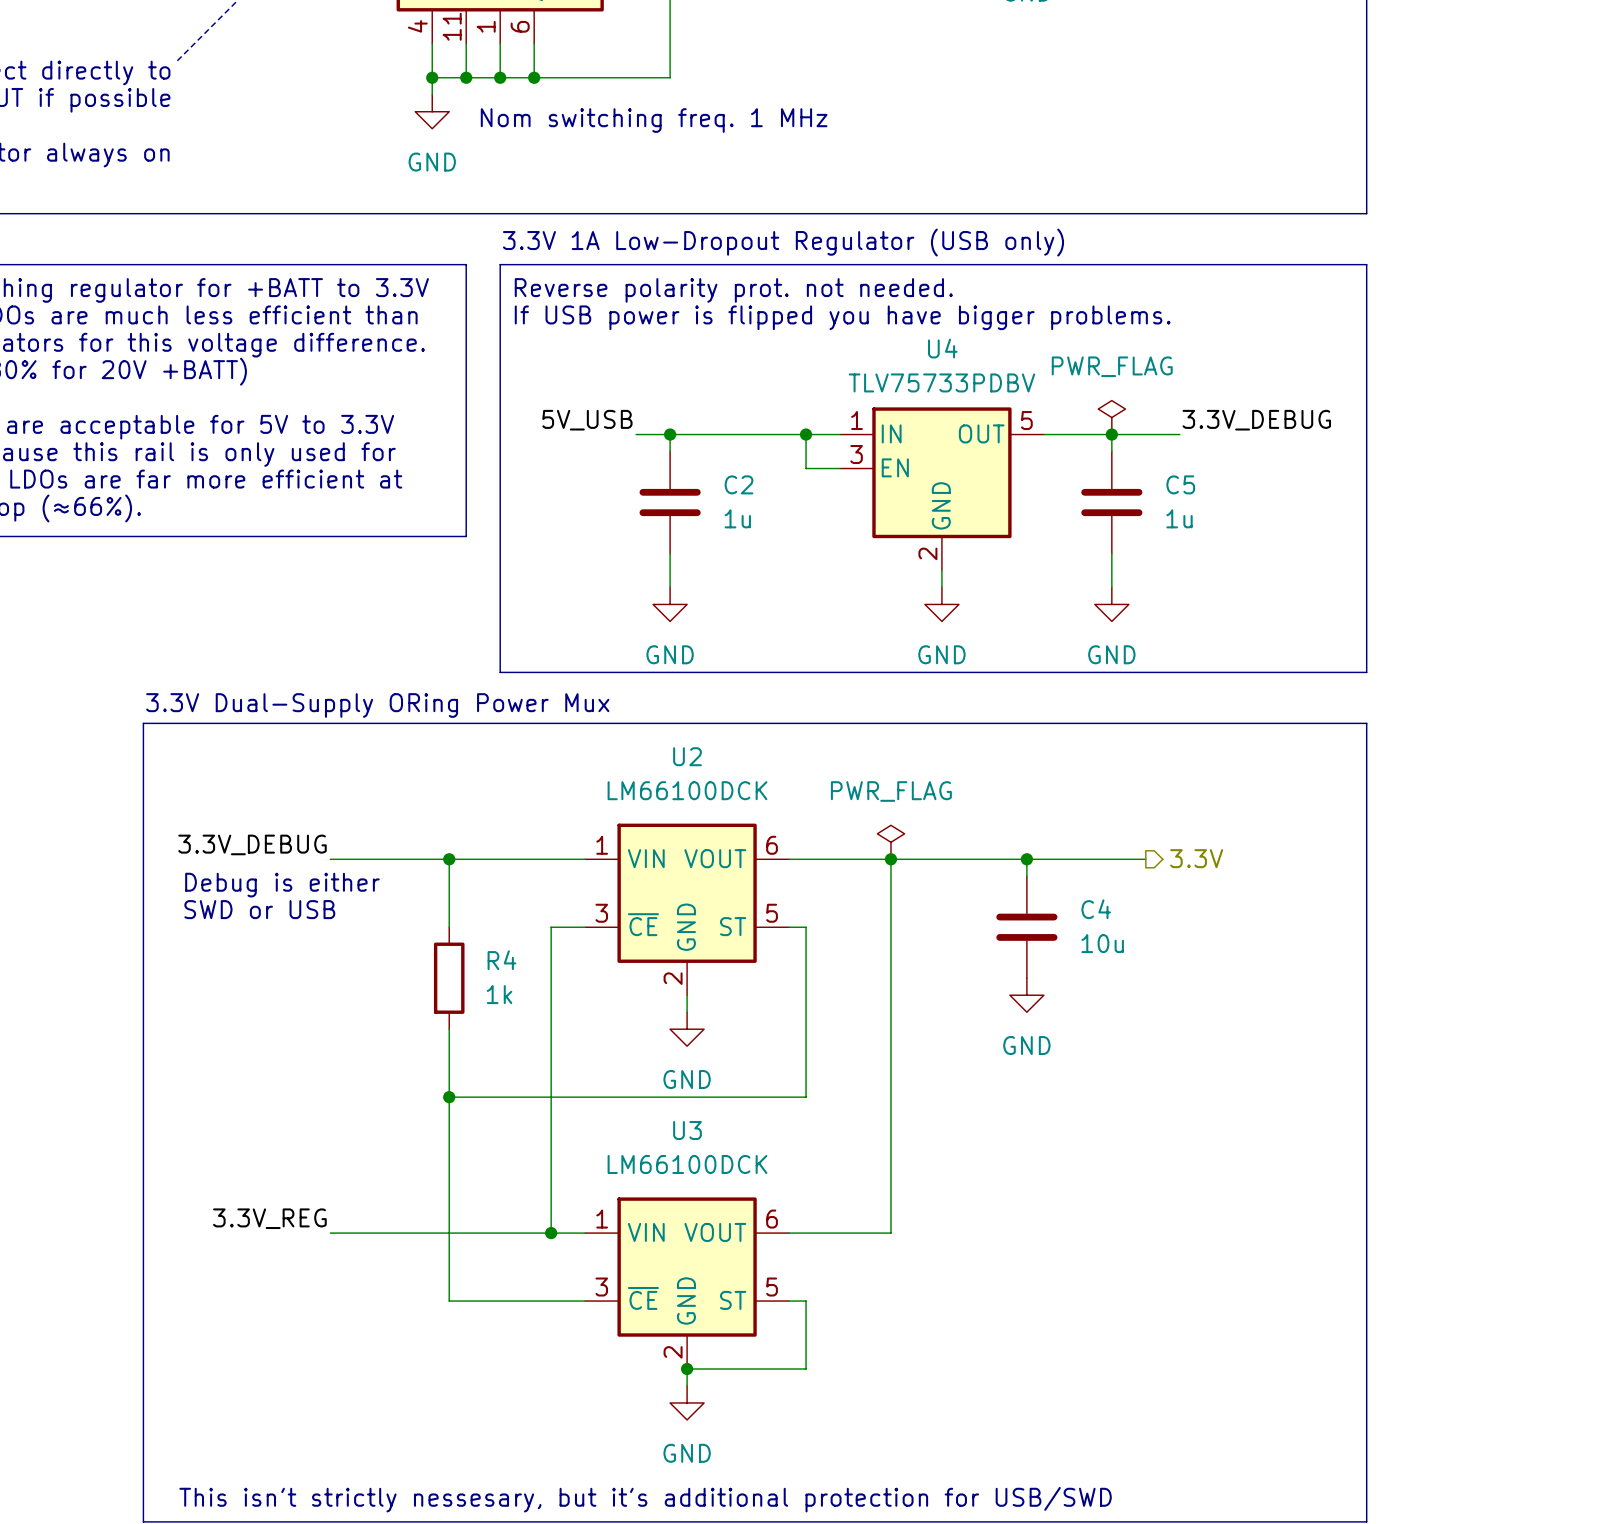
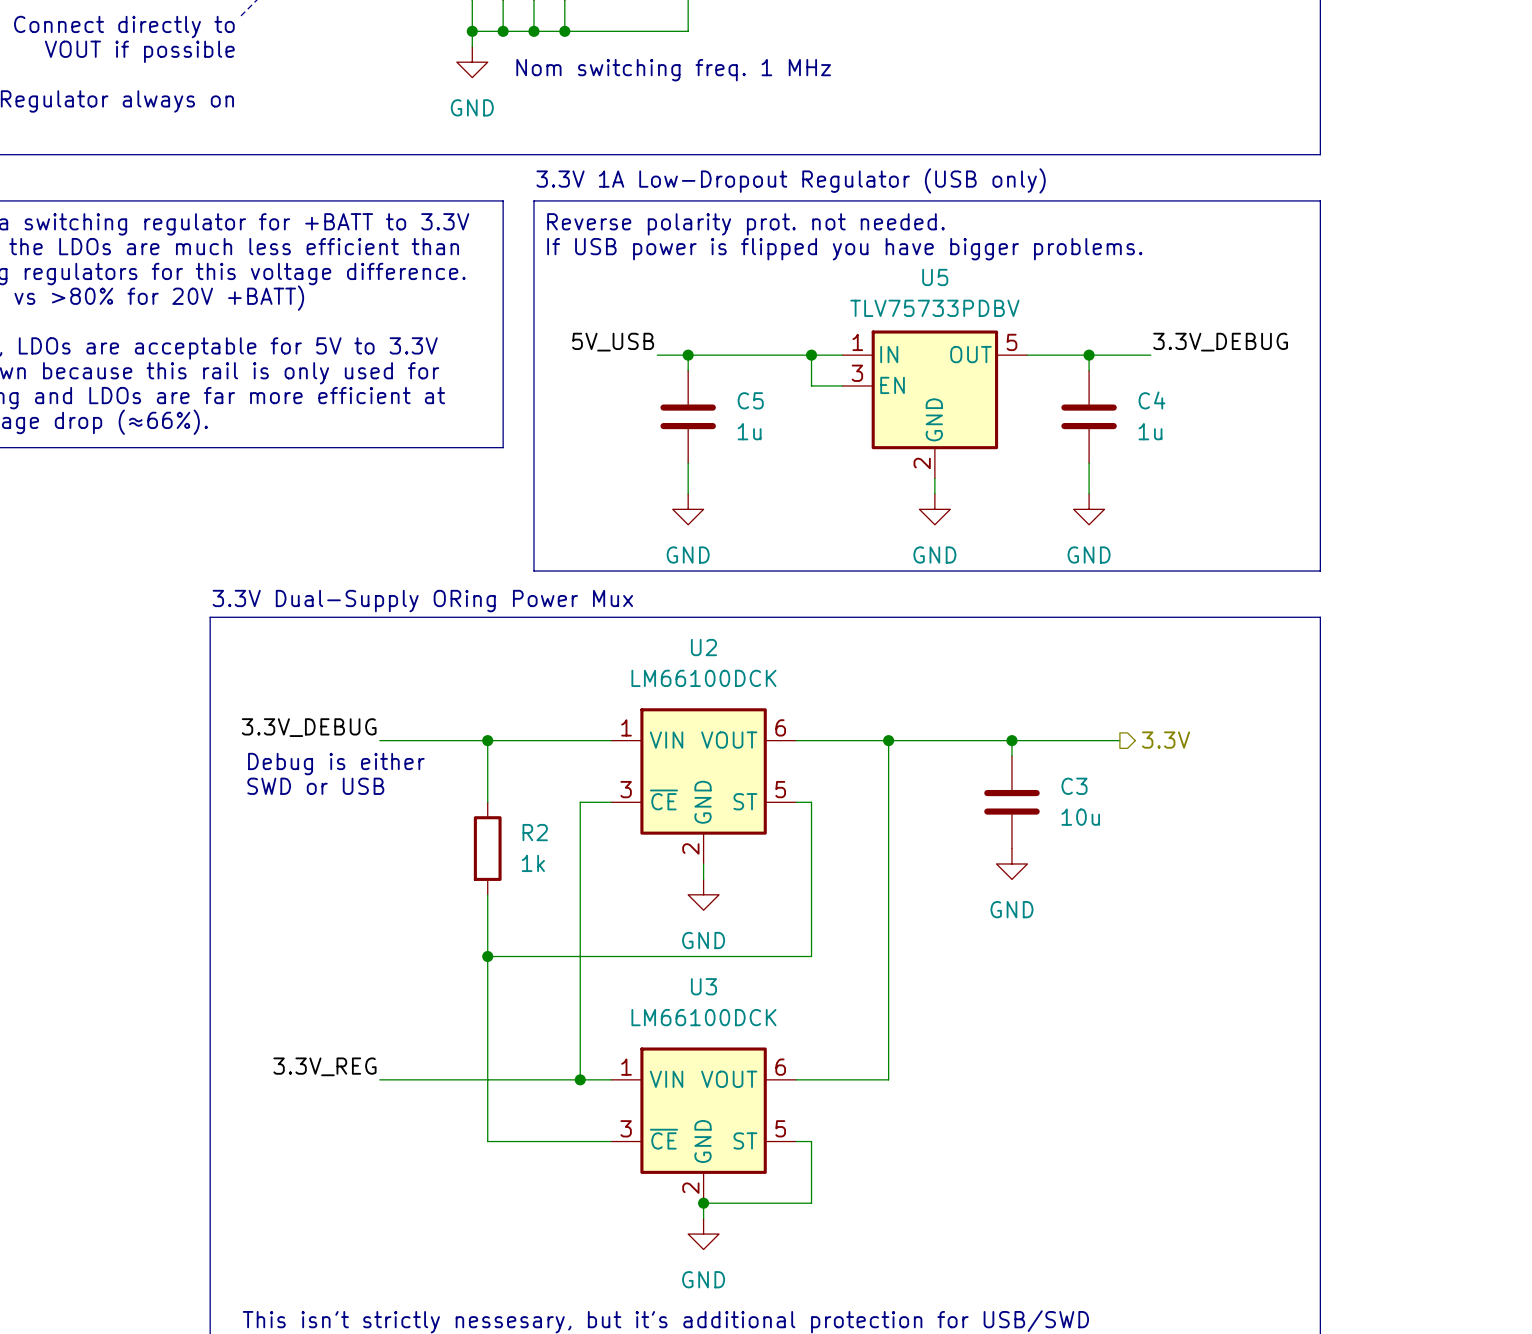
U4 name: U4 (942, 348) -> U5 (935, 277)
power symbol: PWR_FLAG (1111, 417) -> none
C2 name: C2 (739, 484) -> C5 (750, 400)
C5 name: C5 (1180, 484) -> C4 (1151, 400)
power symbol: PWR_FLAG (890, 842) -> none
C4 name: C4 (1096, 909) -> C3 (1074, 786)
R4 name: R4 (501, 960) -> R2 (535, 832)

